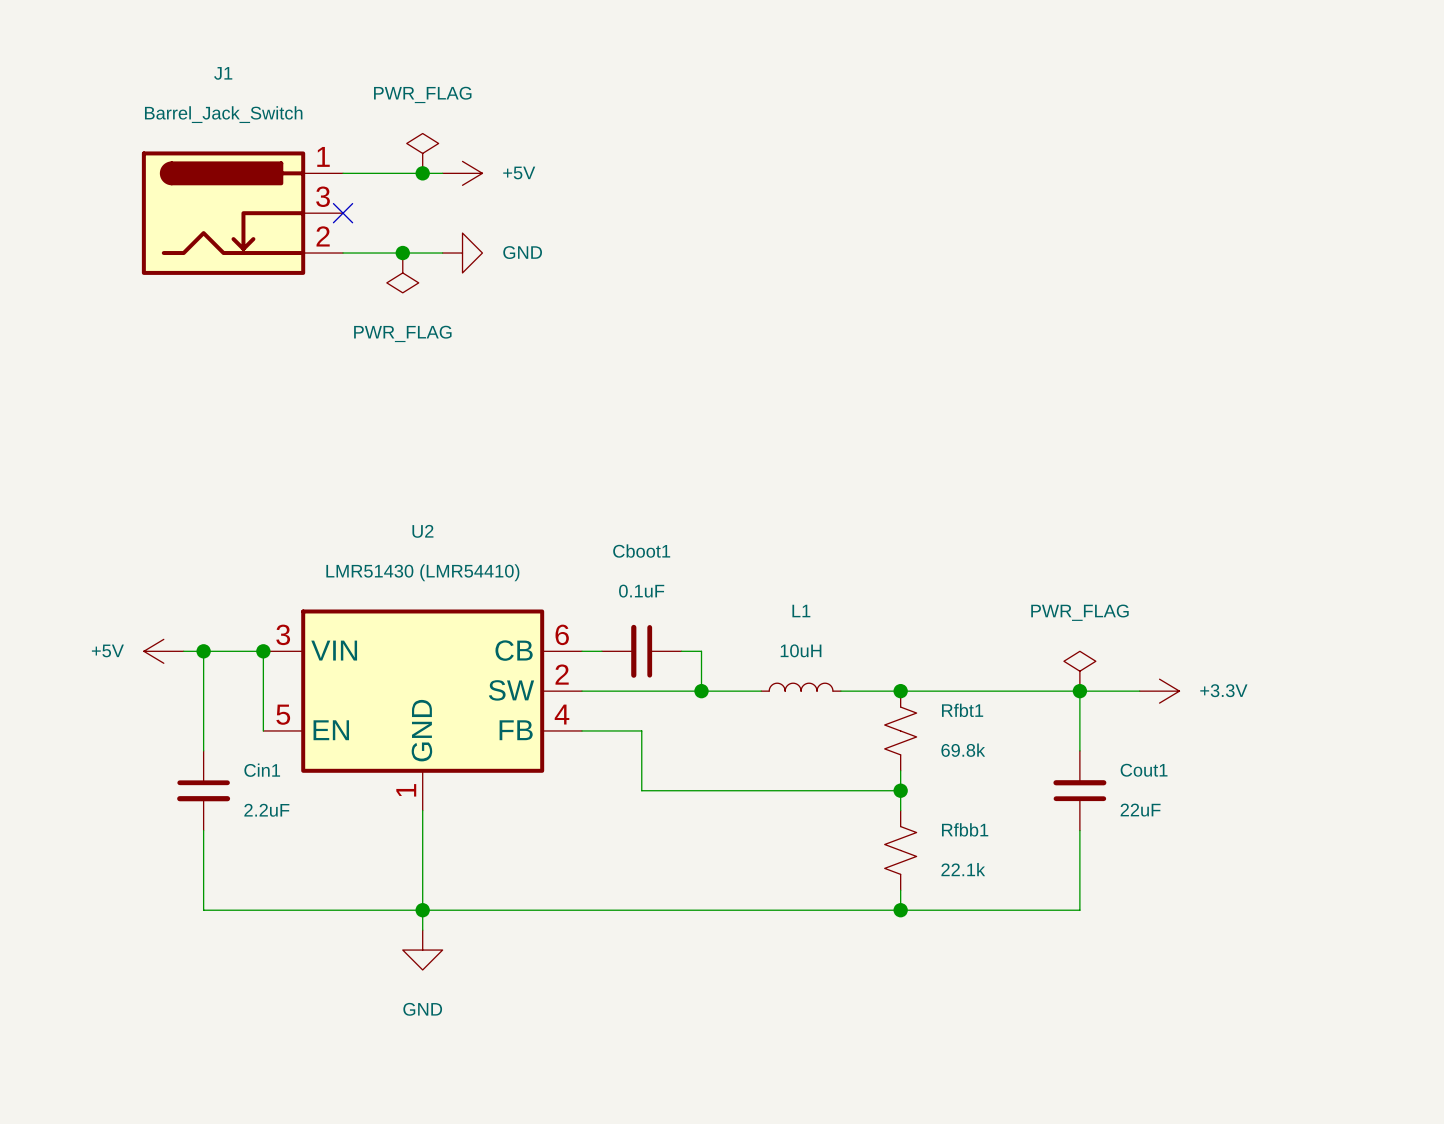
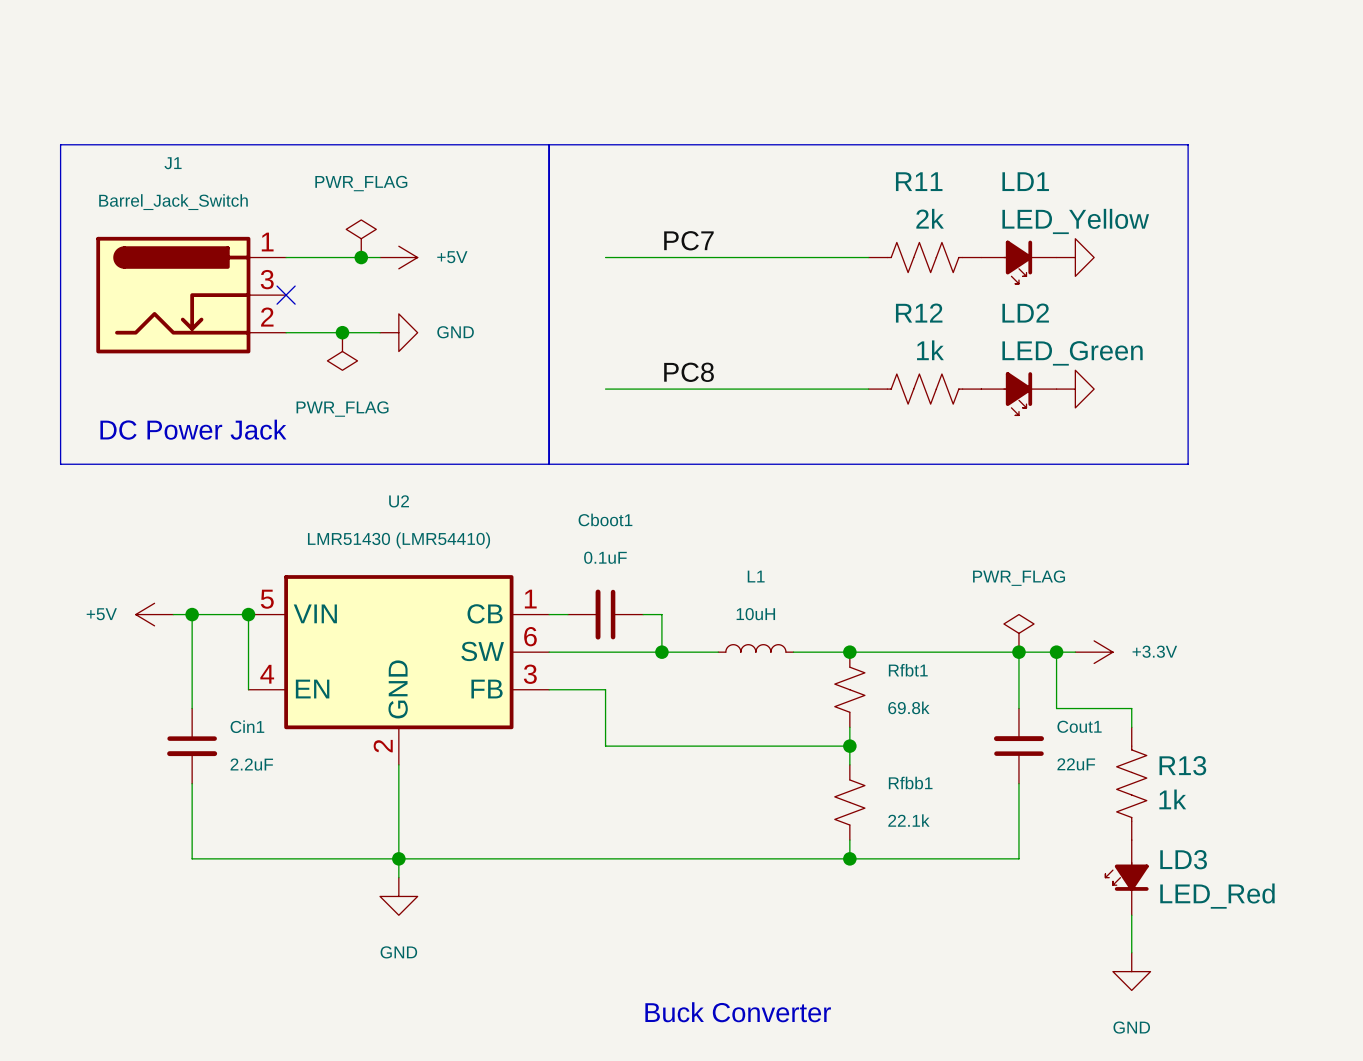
line: none -> (60, 144) (1188, 144) (1188, 464) (60, 464) (60, 144)
power symbol: PWR_FLAG (422, 153) -> none
line: none -> (549, 144) (549, 464)
wire: (343, 173) (442, 173) -> (286, 257) (380, 257)
junction: (422, 173) -> none
power symbol position: +5V (462, 173) -> +5V (398, 257)
J1 position: (242, 213) -> (191, 295)
no-connect mark: (343, 213) -> none
wire: (343, 253) (442, 253) -> (286, 332) (380, 332)
junction position: (402, 253) -> (361, 257)
power symbol position: GND (462, 253) -> GND (398, 332)
label: none -> PC7 (688, 240)
power symbol rotation: 0° (402, 272) -> 180° (361, 238)
power symbol position: PWR_FLAG (402, 272) -> PWR_FLAG (361, 238)
wire: none -> (605, 257) (868, 257)
R11: none -> 2k (925, 257)
power symbol: none -> (1075, 257)
LD1: none -> LED_Yellow (1018, 262)
no-connect mark: none -> (286, 295)
junction: none -> (342, 332)
power symbol: none -> PWR_FLAG (342, 351)
label: none -> PC8 (689, 372)
wire: none -> (605, 389) (868, 389)
R12: none -> 1k (925, 389)
power symbol: none -> (1075, 389)
LD2: none -> LED_Green (1018, 393)
text: none -> DC Power Jack (193, 429)
U2 pin number: 3 (283, 634) -> 5 (267, 599)
U2 pin number: 6 (562, 634) -> 1 (530, 599)
U2 pin number: 2 (562, 674) -> 6 (530, 636)
wire: none -> (1056, 652) (1056, 708) (1131, 708) (1131, 727)
junction: none -> (1056, 652)
U2 pin number: 5 (283, 714) -> 4 (267, 674)
U2 pin number: 4 (562, 714) -> 3 (530, 674)
U2 pin number: 1 (406, 790) -> 2 (383, 746)
R13: none -> 1k (1131, 783)
LD3: none -> LED_Red (1127, 877)
wire: none -> (1131, 915) (1131, 952)
power symbol: none -> GND (1131, 971)
text: none -> Buck Converter (738, 1012)

